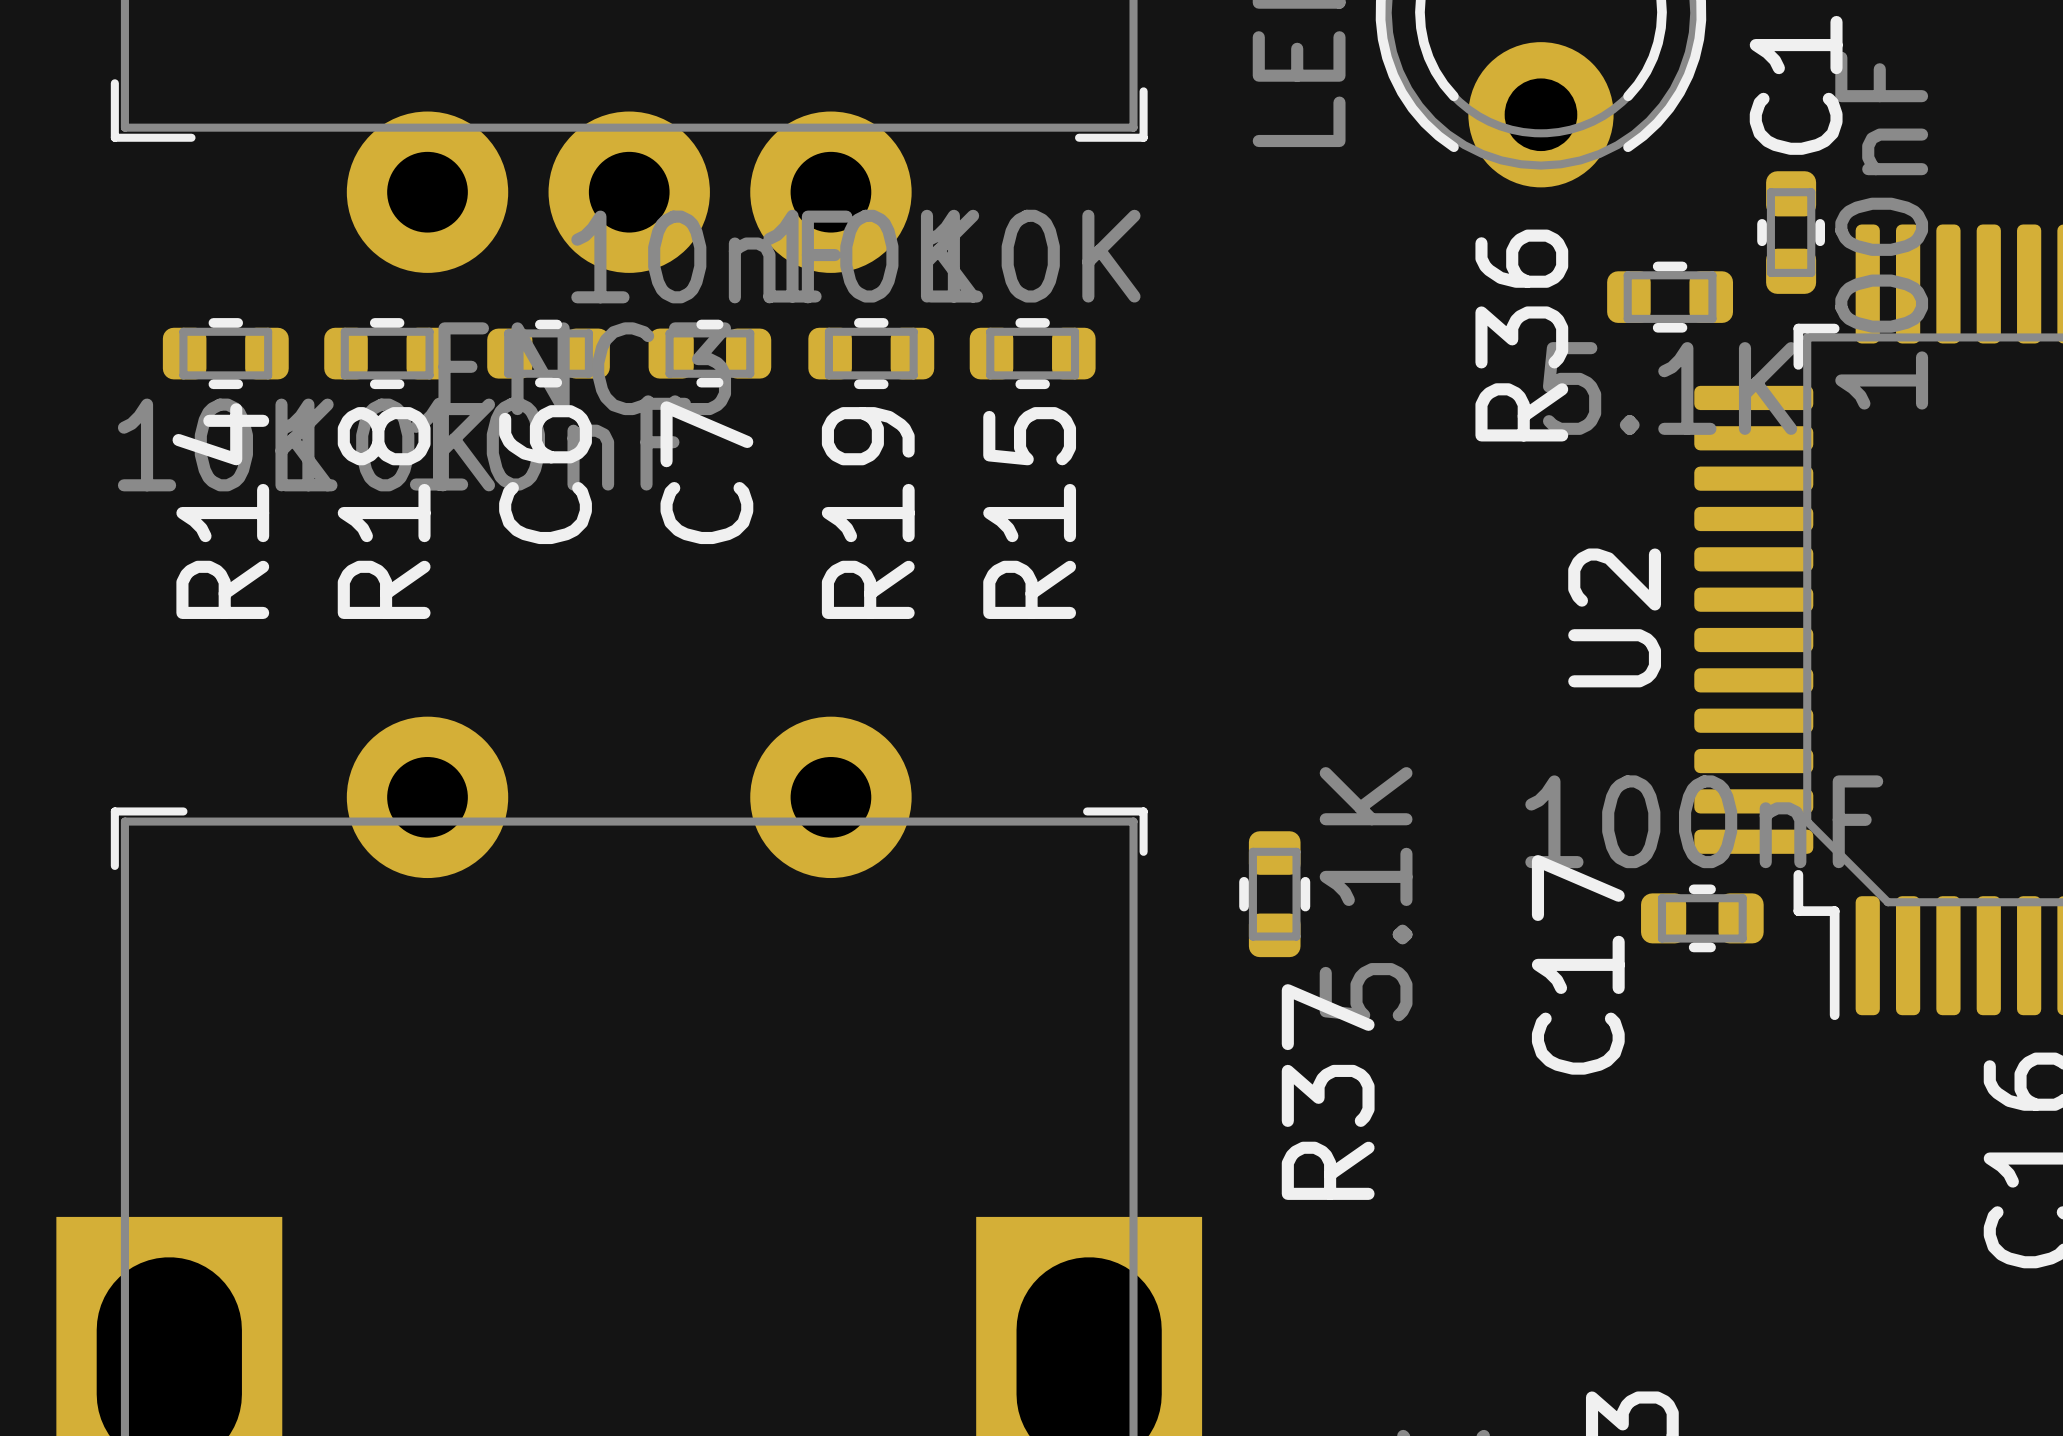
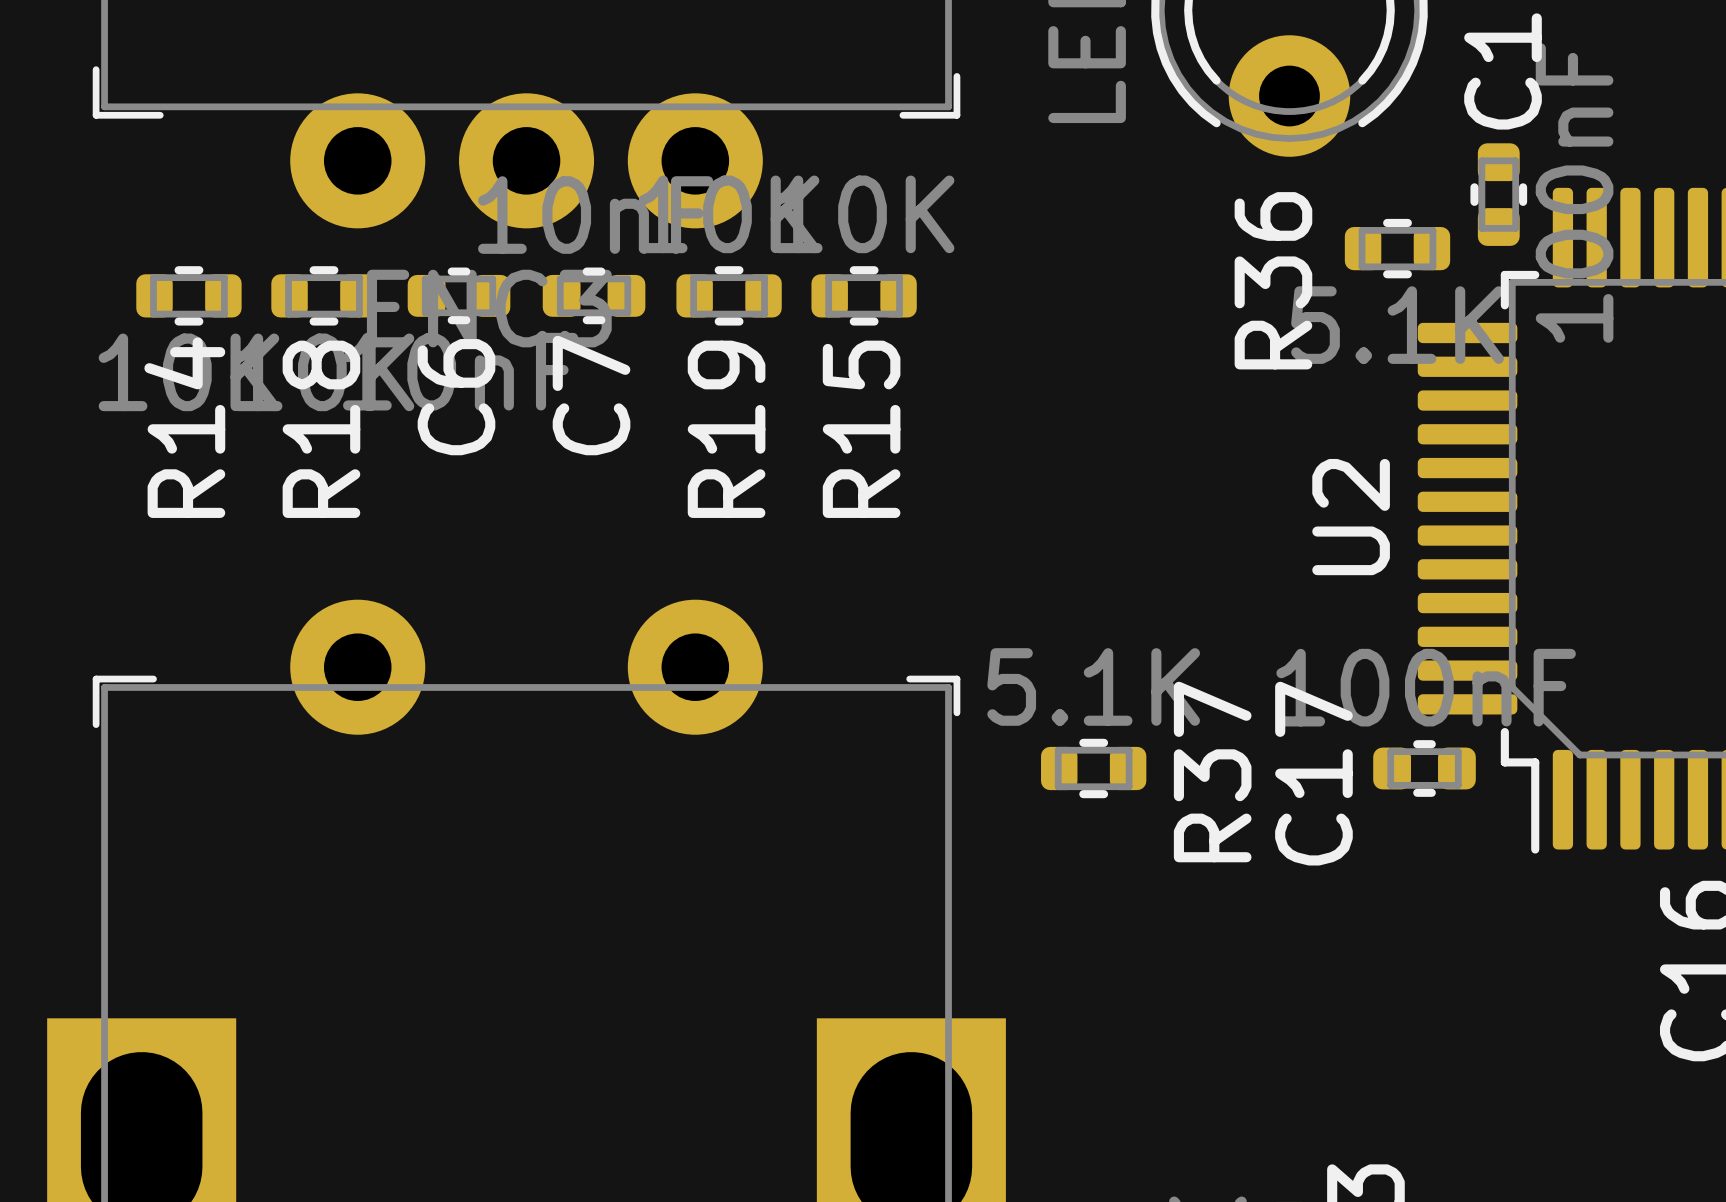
R37 rotation: 0° (1274, 894) -> 90° clockwise (1093, 768)
C17 name position: C17 (1578, 964) -> C17 (1313, 773)
R37 name position: R37 (1328, 1092) -> R37 (1212, 772)

